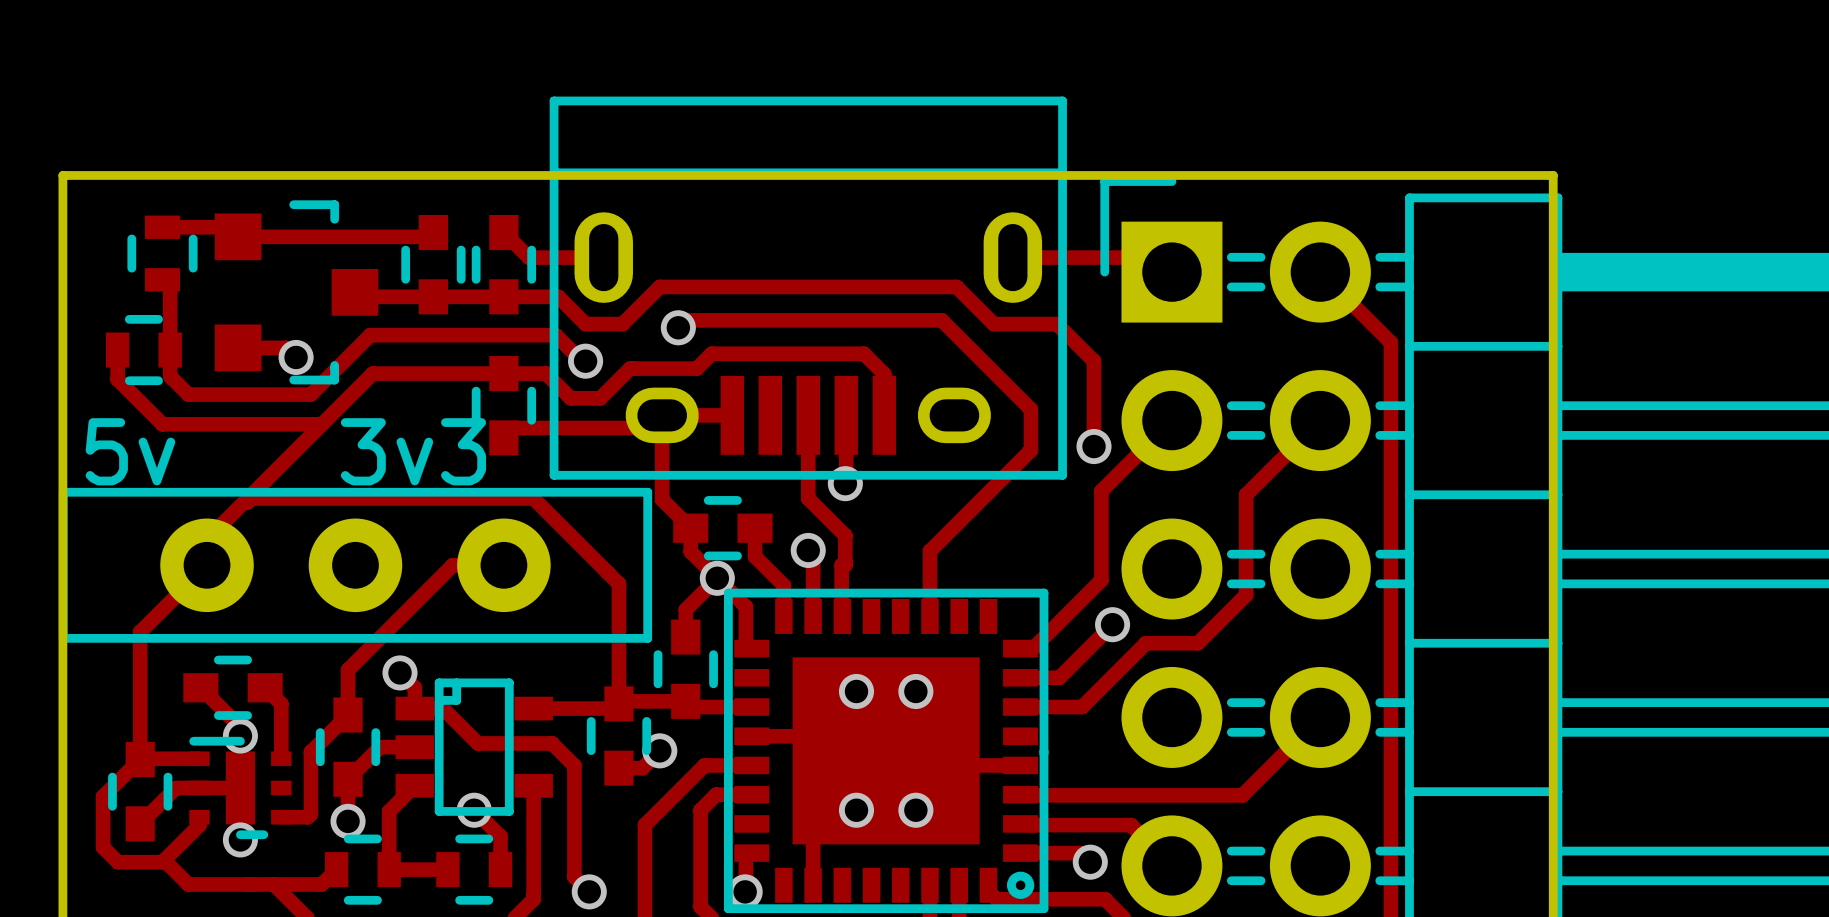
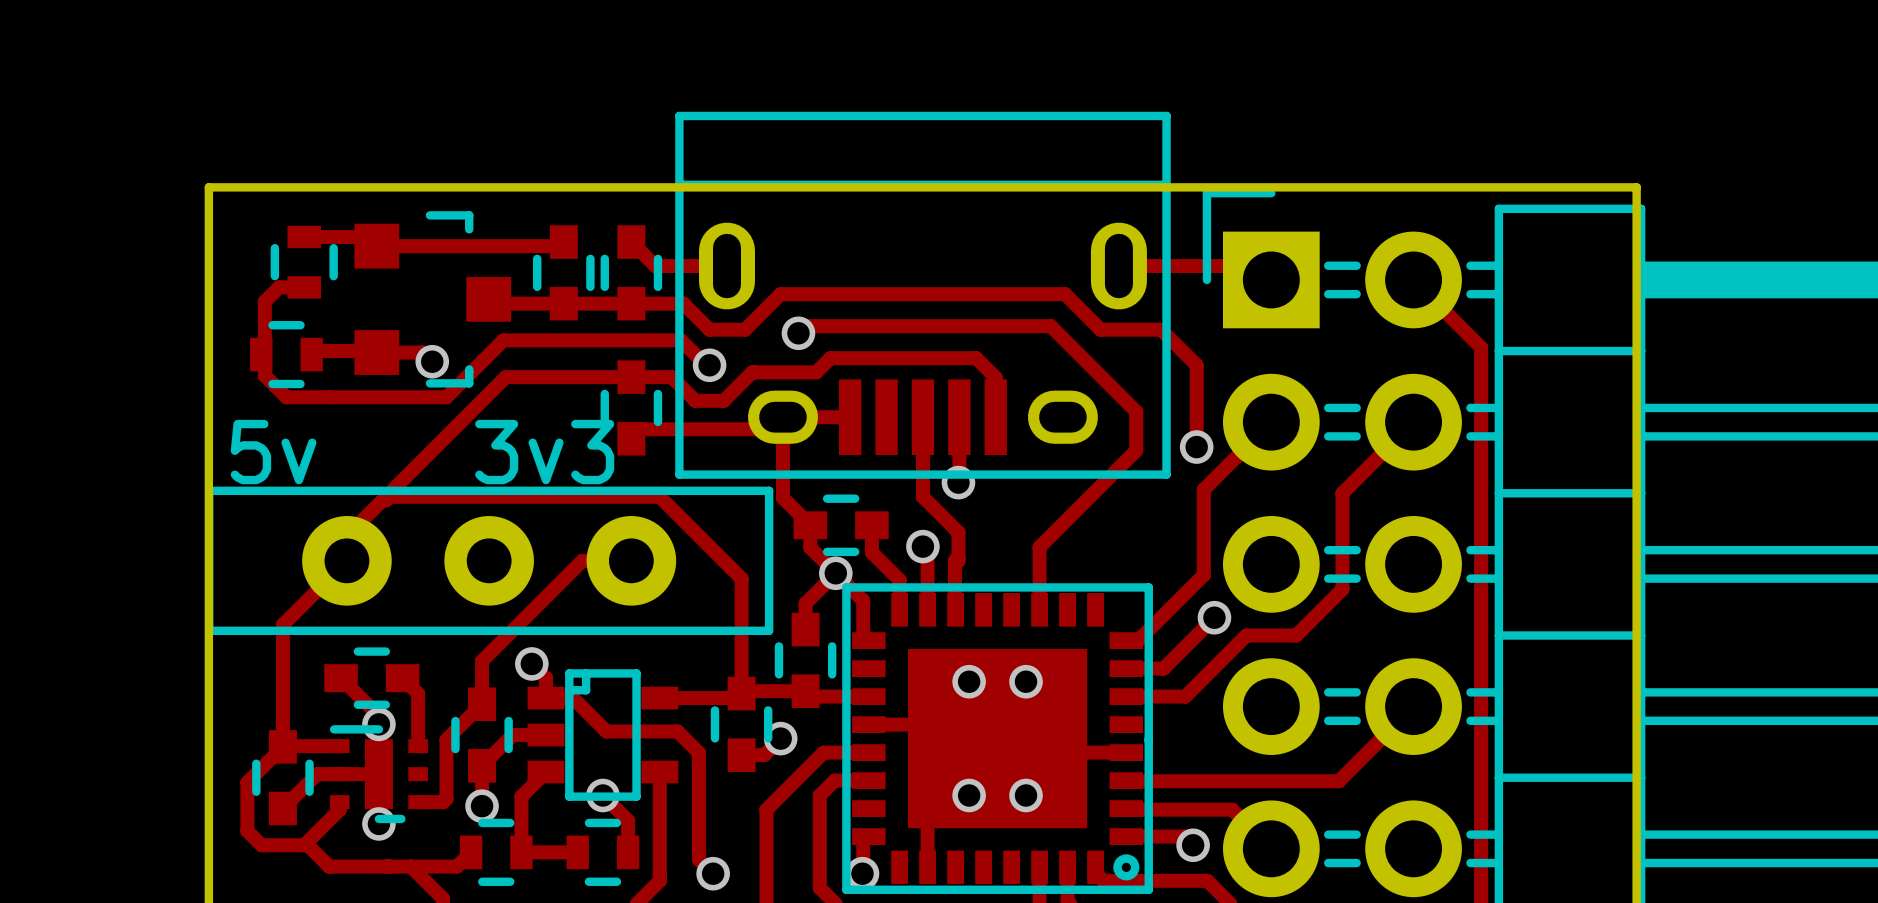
track: (162, 279) (170, 287) (170, 376) (188, 394) -> (304, 287) (279, 287) (264, 301) (264, 375) (286, 397) (329, 397)
track: none -> (315, 351) (375, 351) (376, 352) (374, 354)
track: (117, 350) (117, 379) (162, 424) (322, 424) -> none

